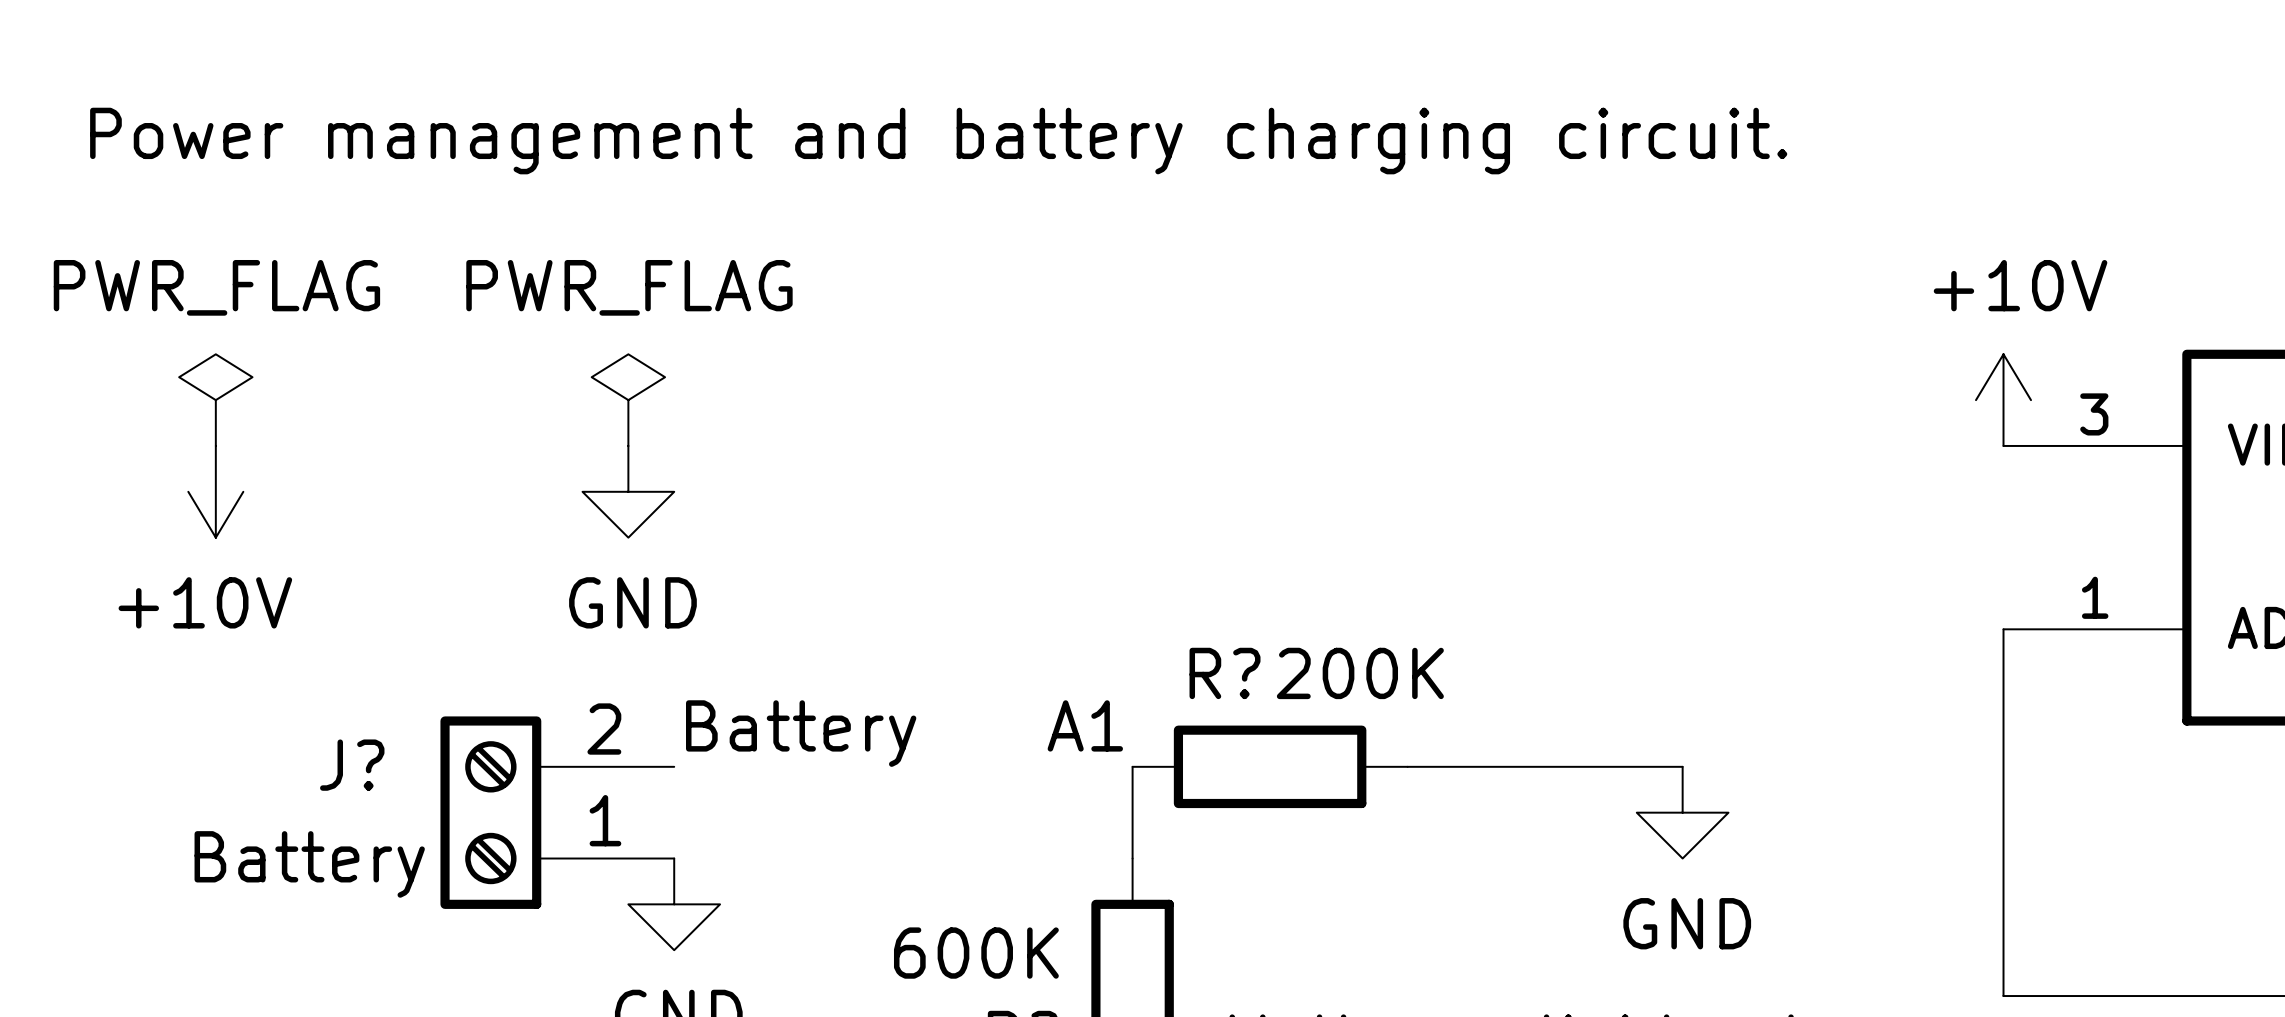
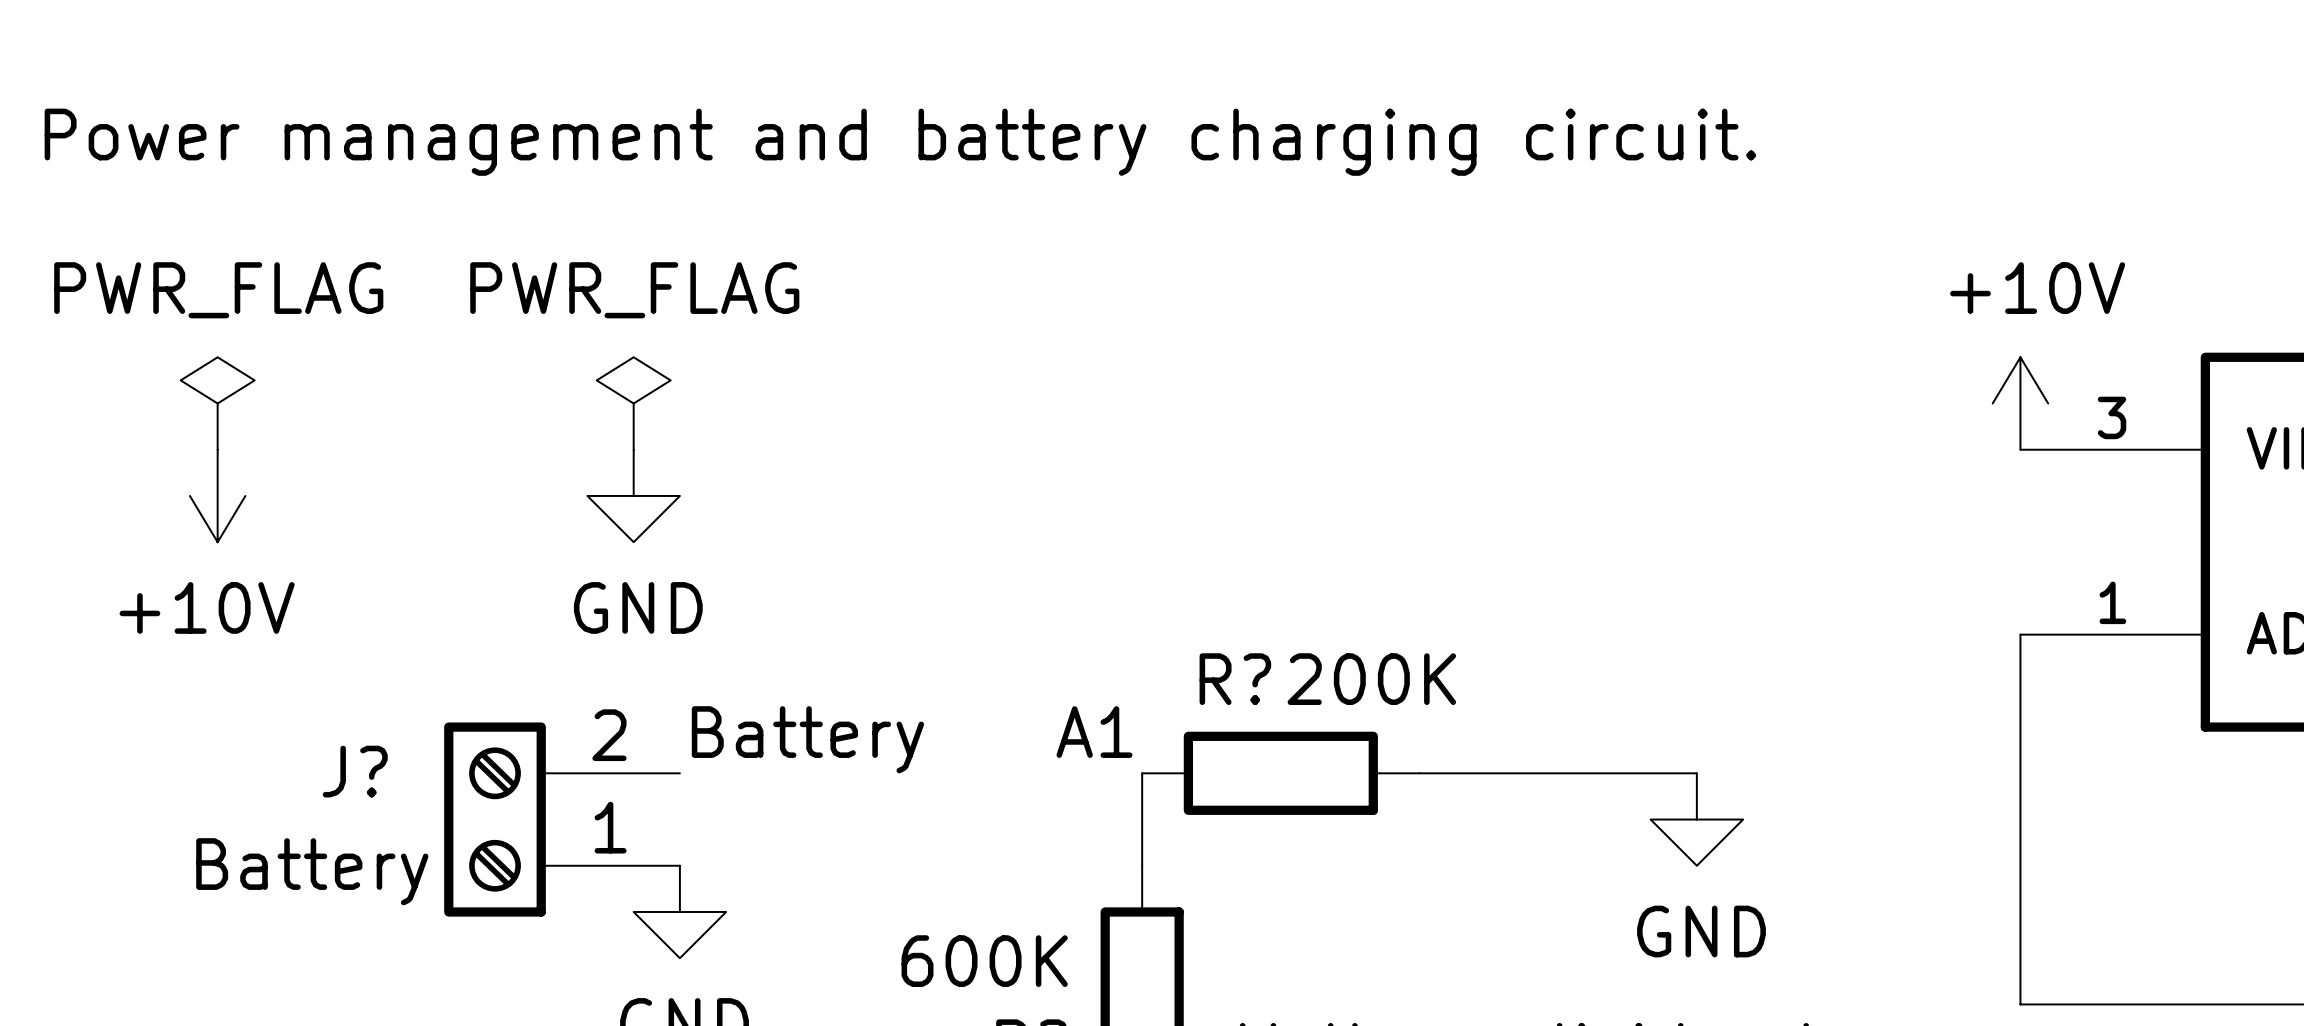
text position: Power management and battery charging circuit. (938, 141) -> Power management and battery charging circuit. (900, 142)

